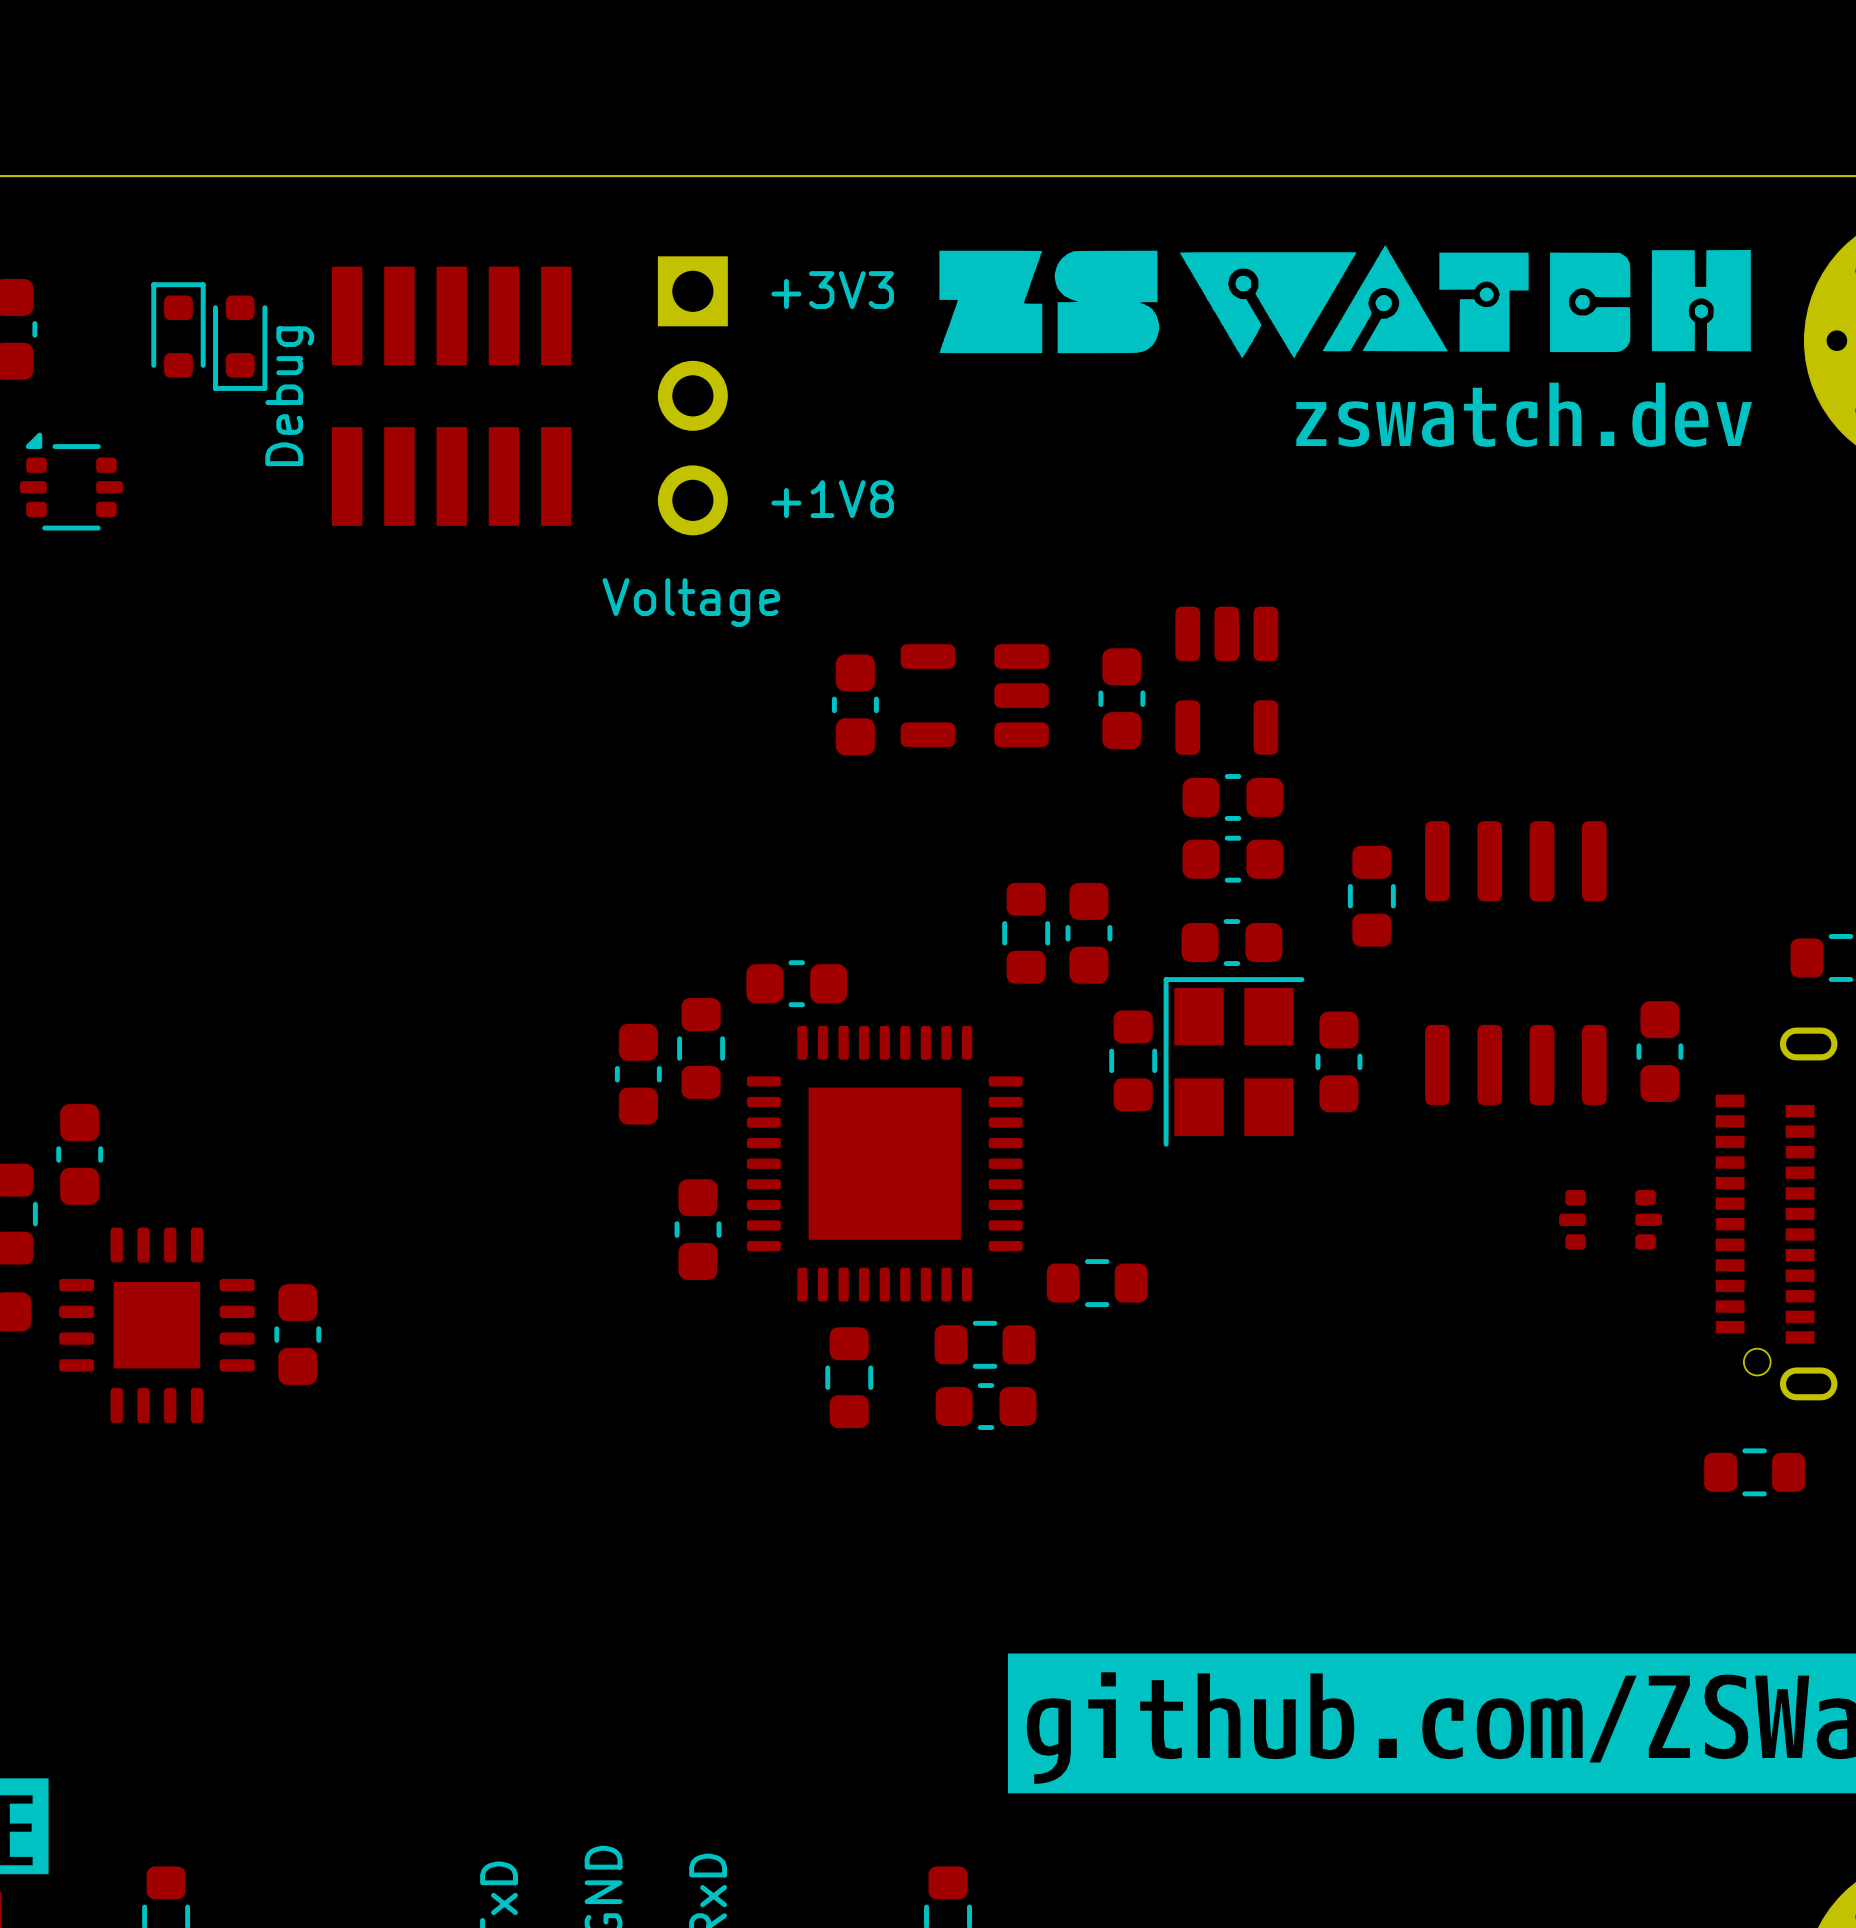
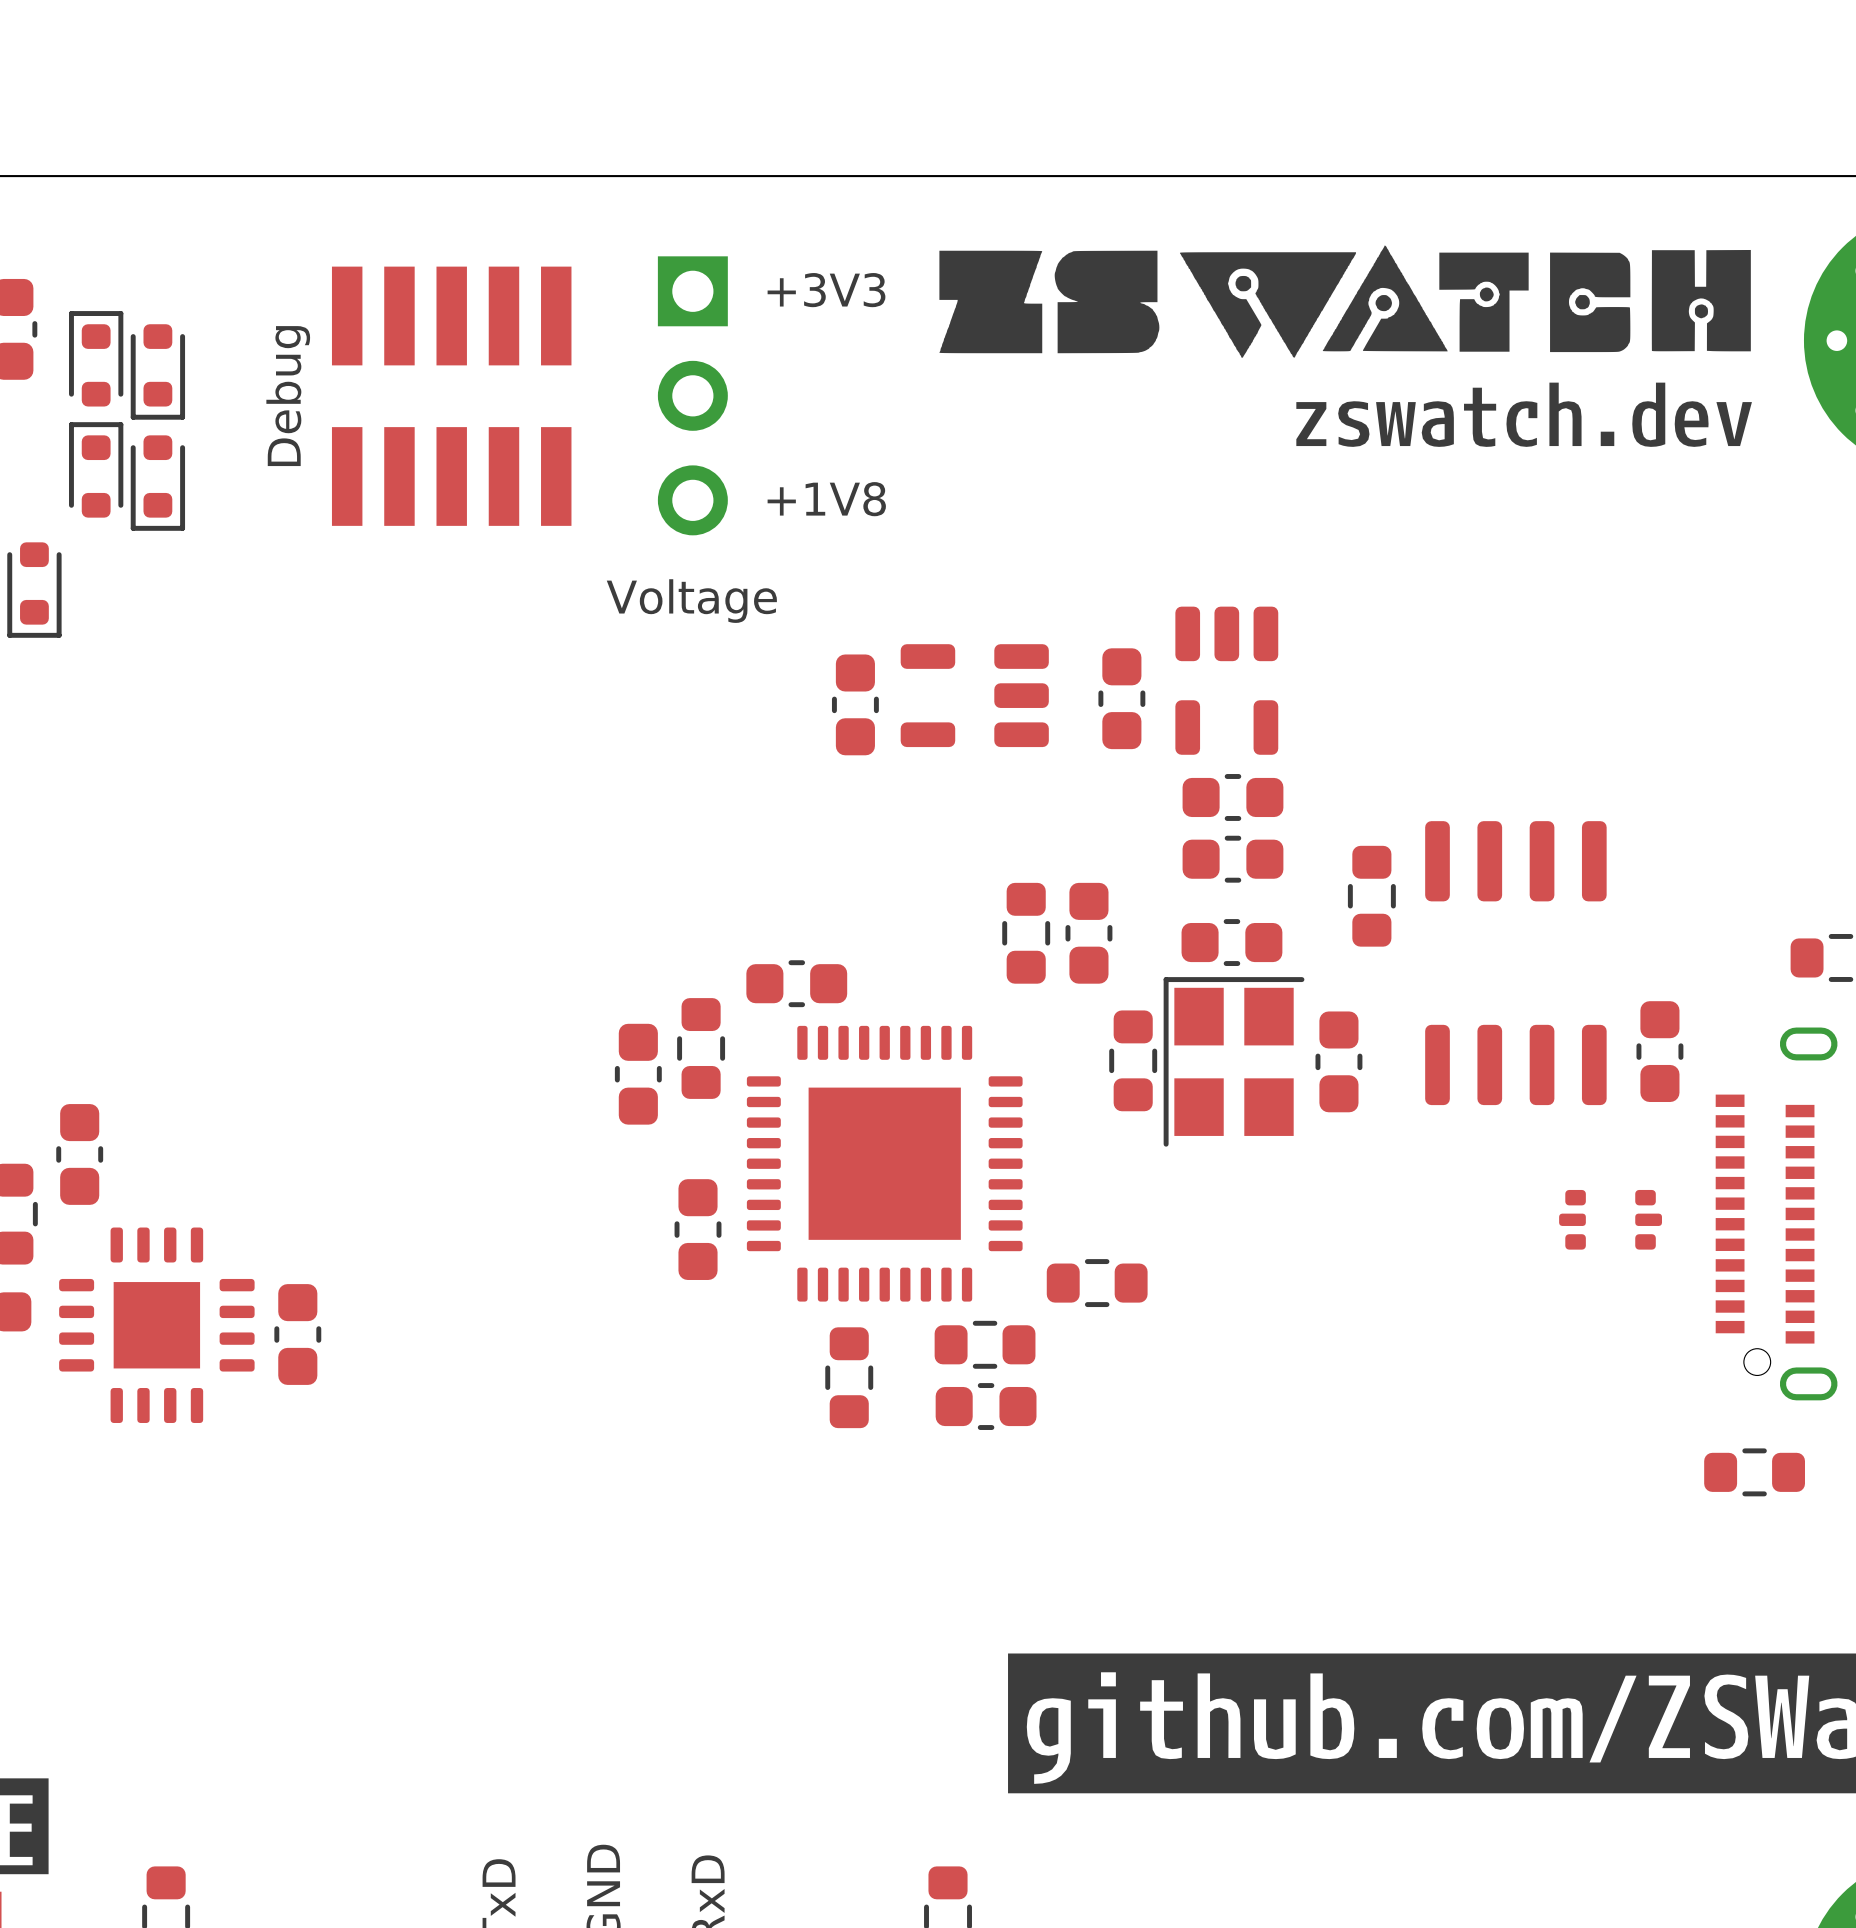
part: (178, 329) -> none
part: (240, 343) -> none
part: none -> (96, 358)
part: none -> (157, 371)
part footprint: [20, 432, 123, 531] -> [69, 422, 124, 518]
part: none -> (157, 483)
part: none -> (34, 590)

